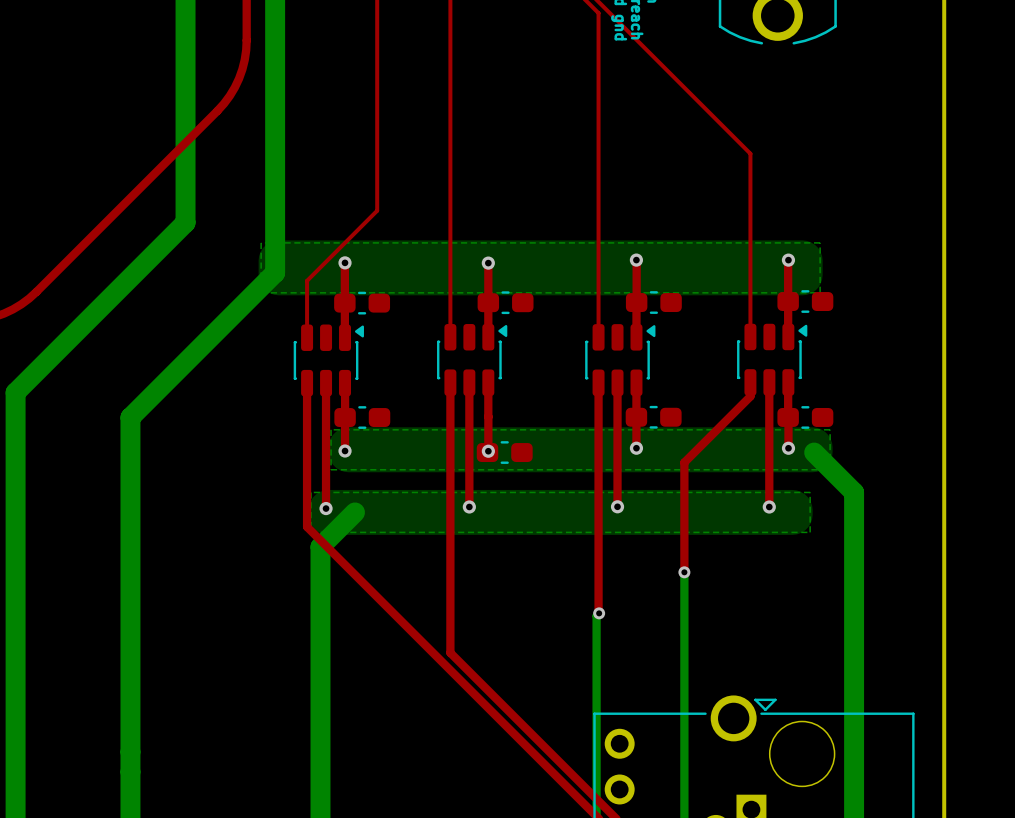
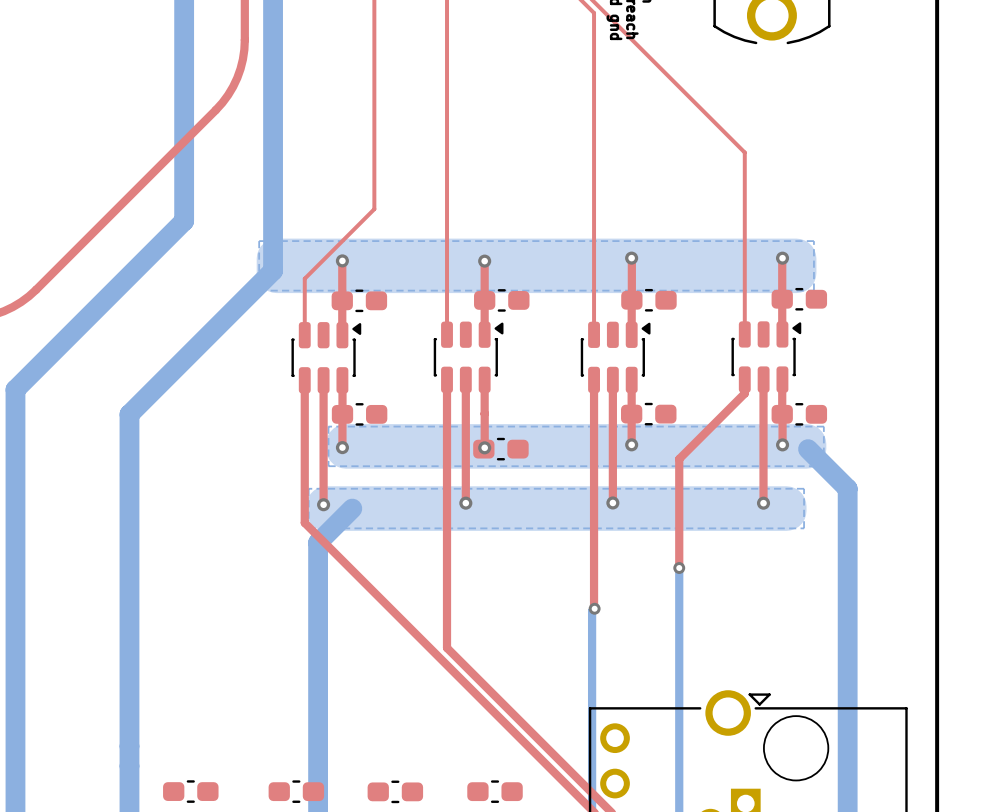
part: none -> (190, 791)
part: none -> (296, 791)
part: none -> (395, 791)
part: none -> (495, 791)

